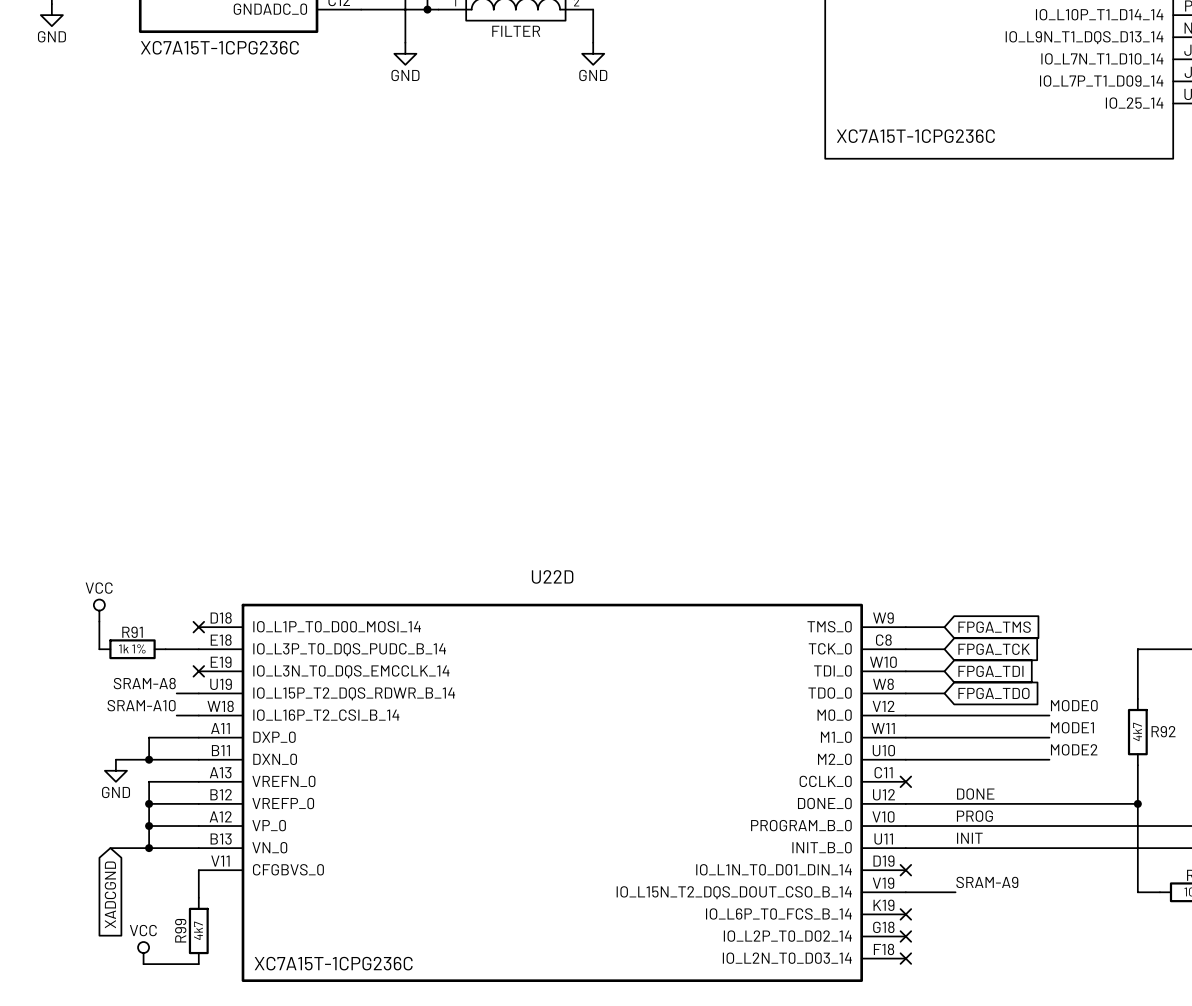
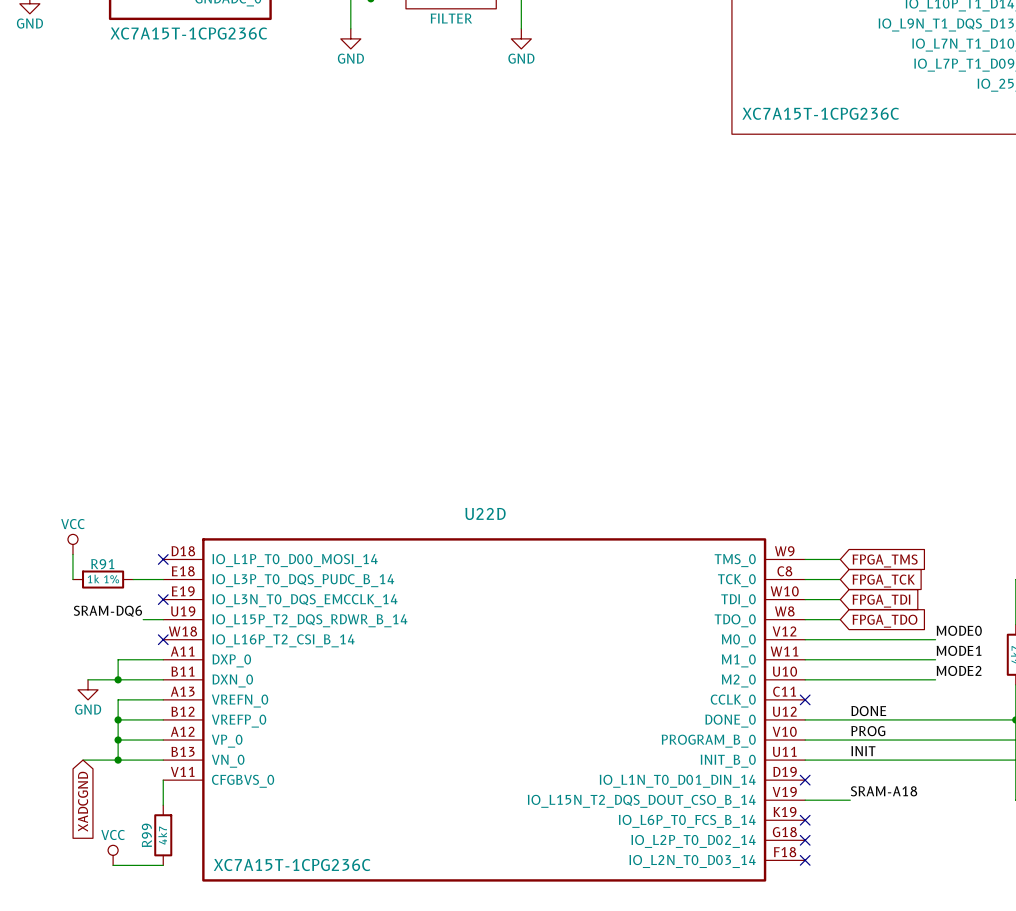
label: SRAM-A8 (144, 683) -> SRAM-DQ6 (107, 611)
label: SRAM-A10 (141, 705) -> none
wire: (176, 715) (198, 715) -> none
no-connect mark: none -> (163, 639)
label: SRAM-A9 (987, 882) -> SRAM-A18 (884, 791)

